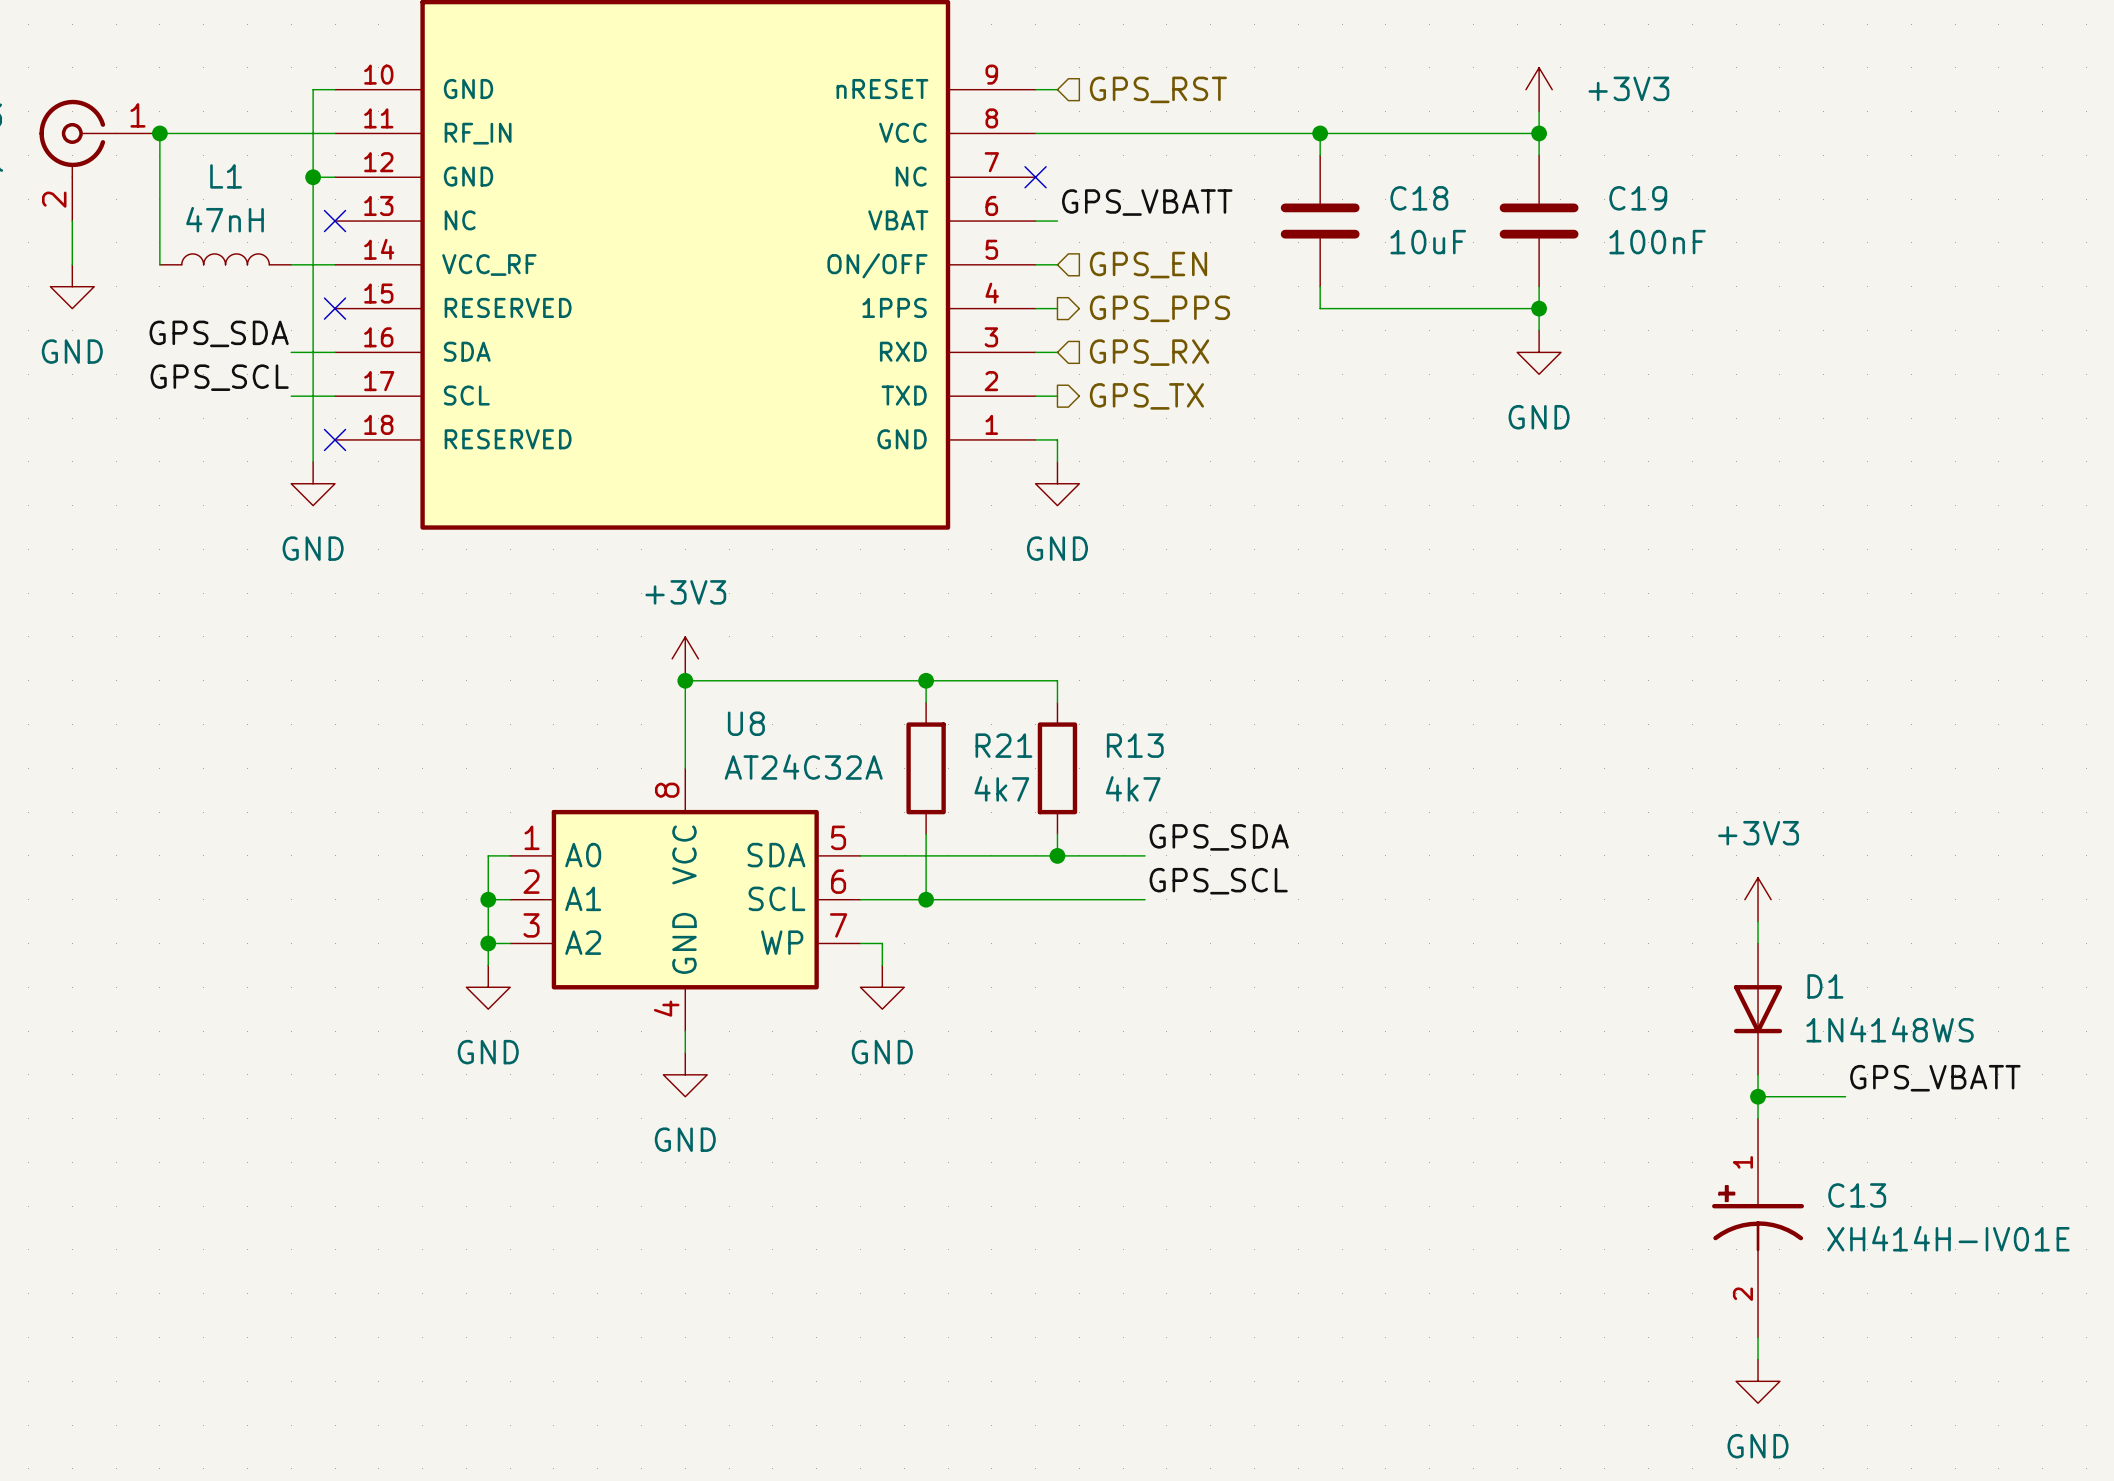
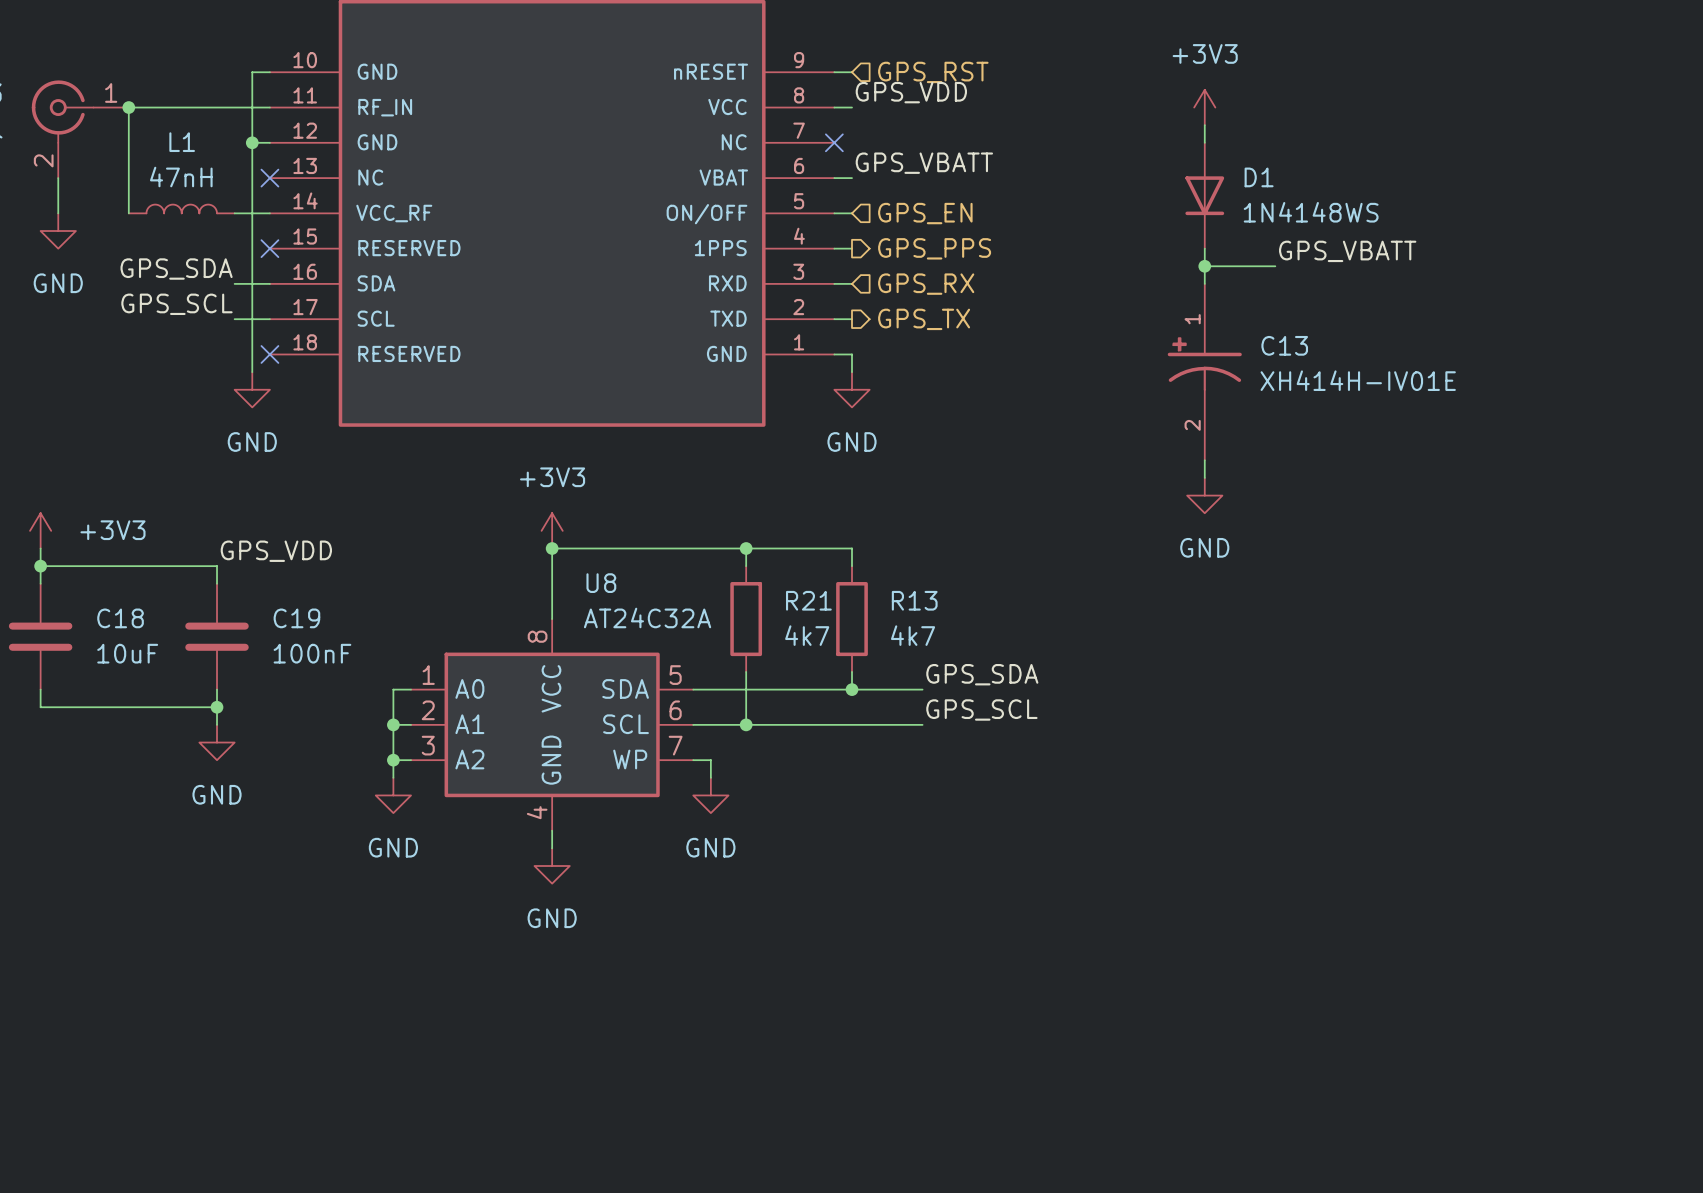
power symbol text position: +3V3 (1628, 88) -> +3V3 (1205, 53)
power symbol position: +3V3 (1539, 89) -> +3V3 (1204, 107)
wire: (1539, 111) (1539, 155) -> none
label: none -> GPS_VDD (911, 92)
wire: (1057, 133) (1539, 133) -> none
wire: (1320, 133) (1320, 155) -> (1204, 125) (1204, 142)
junction: (1320, 133) -> none
junction: (1539, 133) -> none
C18 position: (1320, 221) -> (40, 636)
C19 position: (1539, 221) -> (217, 636)
wire: (1320, 286) (1320, 308) (1539, 308) -> none
wire: (1539, 286) (1539, 330) -> (1204, 248) (1204, 283)
junction position: (1539, 308) -> (1204, 266)
label: none -> GPS_VBATT (1347, 251)
wire: none -> (1204, 266) (1275, 266)
power symbol position: GND (1539, 352) -> GND (1204, 495)
wire: none -> (1204, 460) (1204, 477)
power symbol: none -> +3V3 (40, 530)
wire: none -> (40, 548) (40, 583)
label: none -> GPS_VDD (276, 551)
wire: none -> (40, 566) (217, 566) (217, 583)
junction: none -> (40, 566)
wire: none -> (40, 689) (40, 707) (217, 707)
wire: none -> (217, 689) (217, 724)
junction: none -> (217, 707)
power symbol: +3V3 (1758, 899) -> none
power symbol: none -> GND (217, 742)
wire: (1758, 921) (1758, 943) -> none
D1 position: (1758, 1009) -> (1204, 195)
wire: (1758, 1074) (1758, 1118) -> none
label: GPS_VBATT (1935, 1078) -> none
wire: (1758, 1096) (1845, 1096) -> none
junction: (1758, 1096) -> none
C13 position: (1758, 1228) -> (1204, 372)
wire: (1758, 1337) (1758, 1359) -> none
power symbol: GND (1758, 1381) -> none

